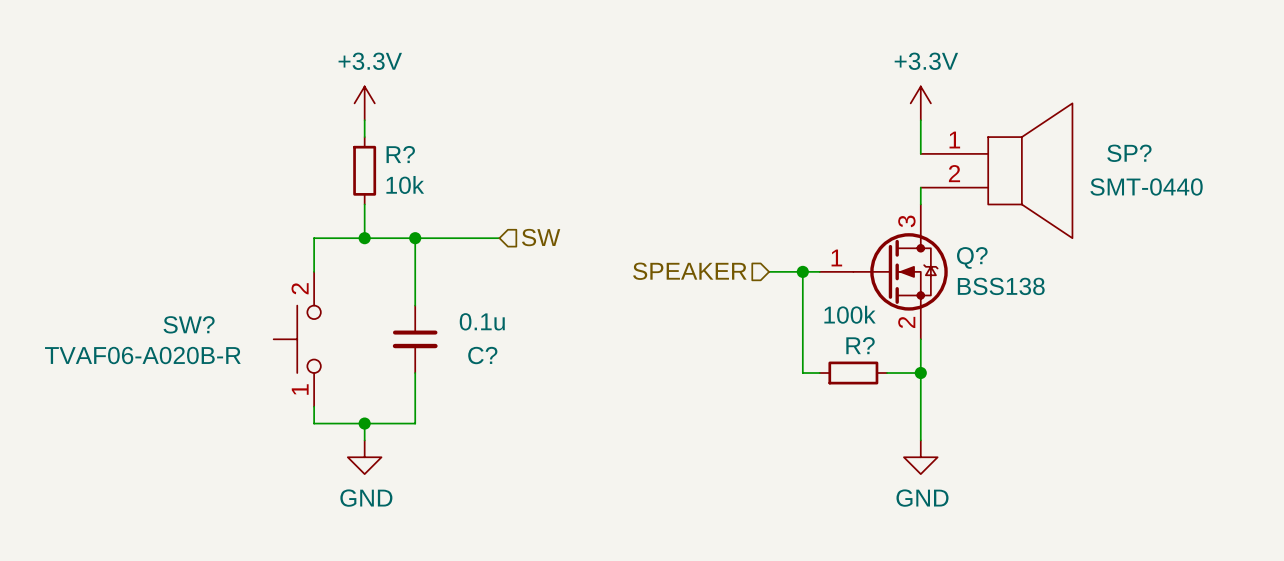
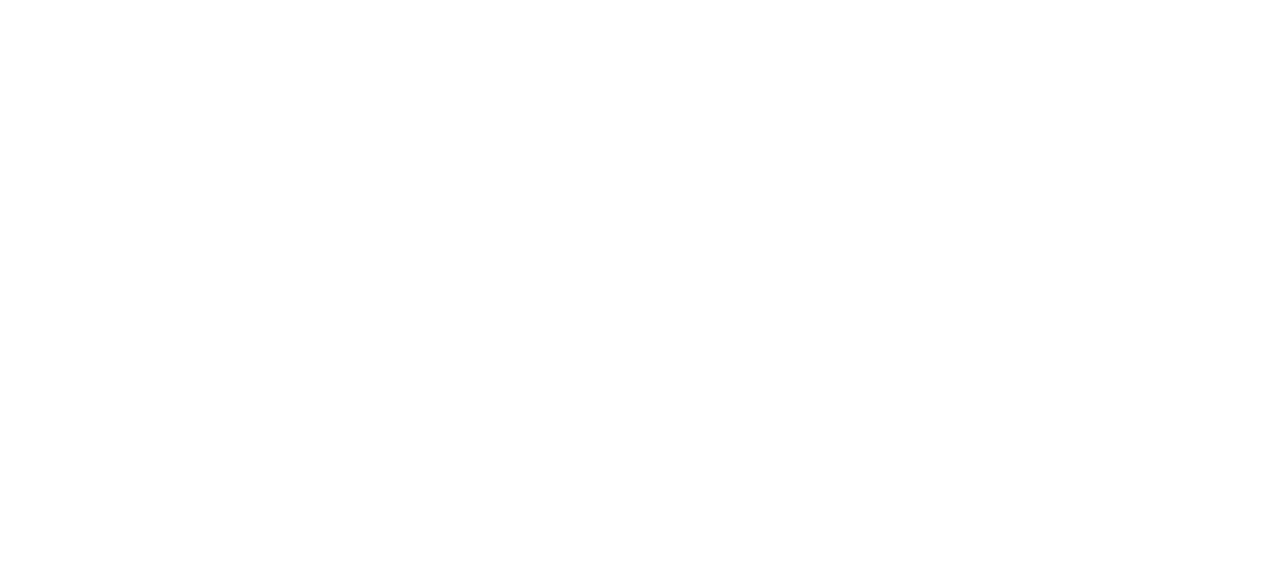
power symbol: +3.3V (364, 103) -> none
power symbol: +3.3V (920, 103) -> none
wire: (364, 120) (364, 137) -> none
wire: (920, 120) (920, 153) -> none
R?: 10k (364, 170) -> none
SP?: SMT-0440 (996, 170) -> none
wire: (920, 187) (920, 204) -> none
wire: (364, 204) (364, 238) -> none
hierarchical label: SW (541, 237) -> none
junction: (364, 238) -> none
wire: (415, 238) (415, 305) -> none
junction: (415, 238) -> none
wire: (499, 238) (314, 238) (314, 271) -> none
hierarchical label: SPEAKER (689, 271) -> none
wire: (769, 271) (819, 271) -> none
wire: (802, 271) (802, 373) (819, 373) -> none
junction: (802, 271) -> none
Q?: BSS138 (883, 271) -> none
SW?: TVAF06-A020B-R (297, 339) -> none
C?: 0.1u (415, 339) -> none
wire: (920, 339) (920, 440) -> none
wire: (415, 373) (415, 423) (314, 423) (314, 406) -> none
R?: 100k (853, 373) -> none
wire: (887, 373) (920, 373) -> none
junction: (920, 373) -> none
wire: (364, 423) (364, 440) -> none
junction: (364, 423) -> none
power symbol: GND (364, 457) -> none
power symbol: GND (920, 457) -> none

